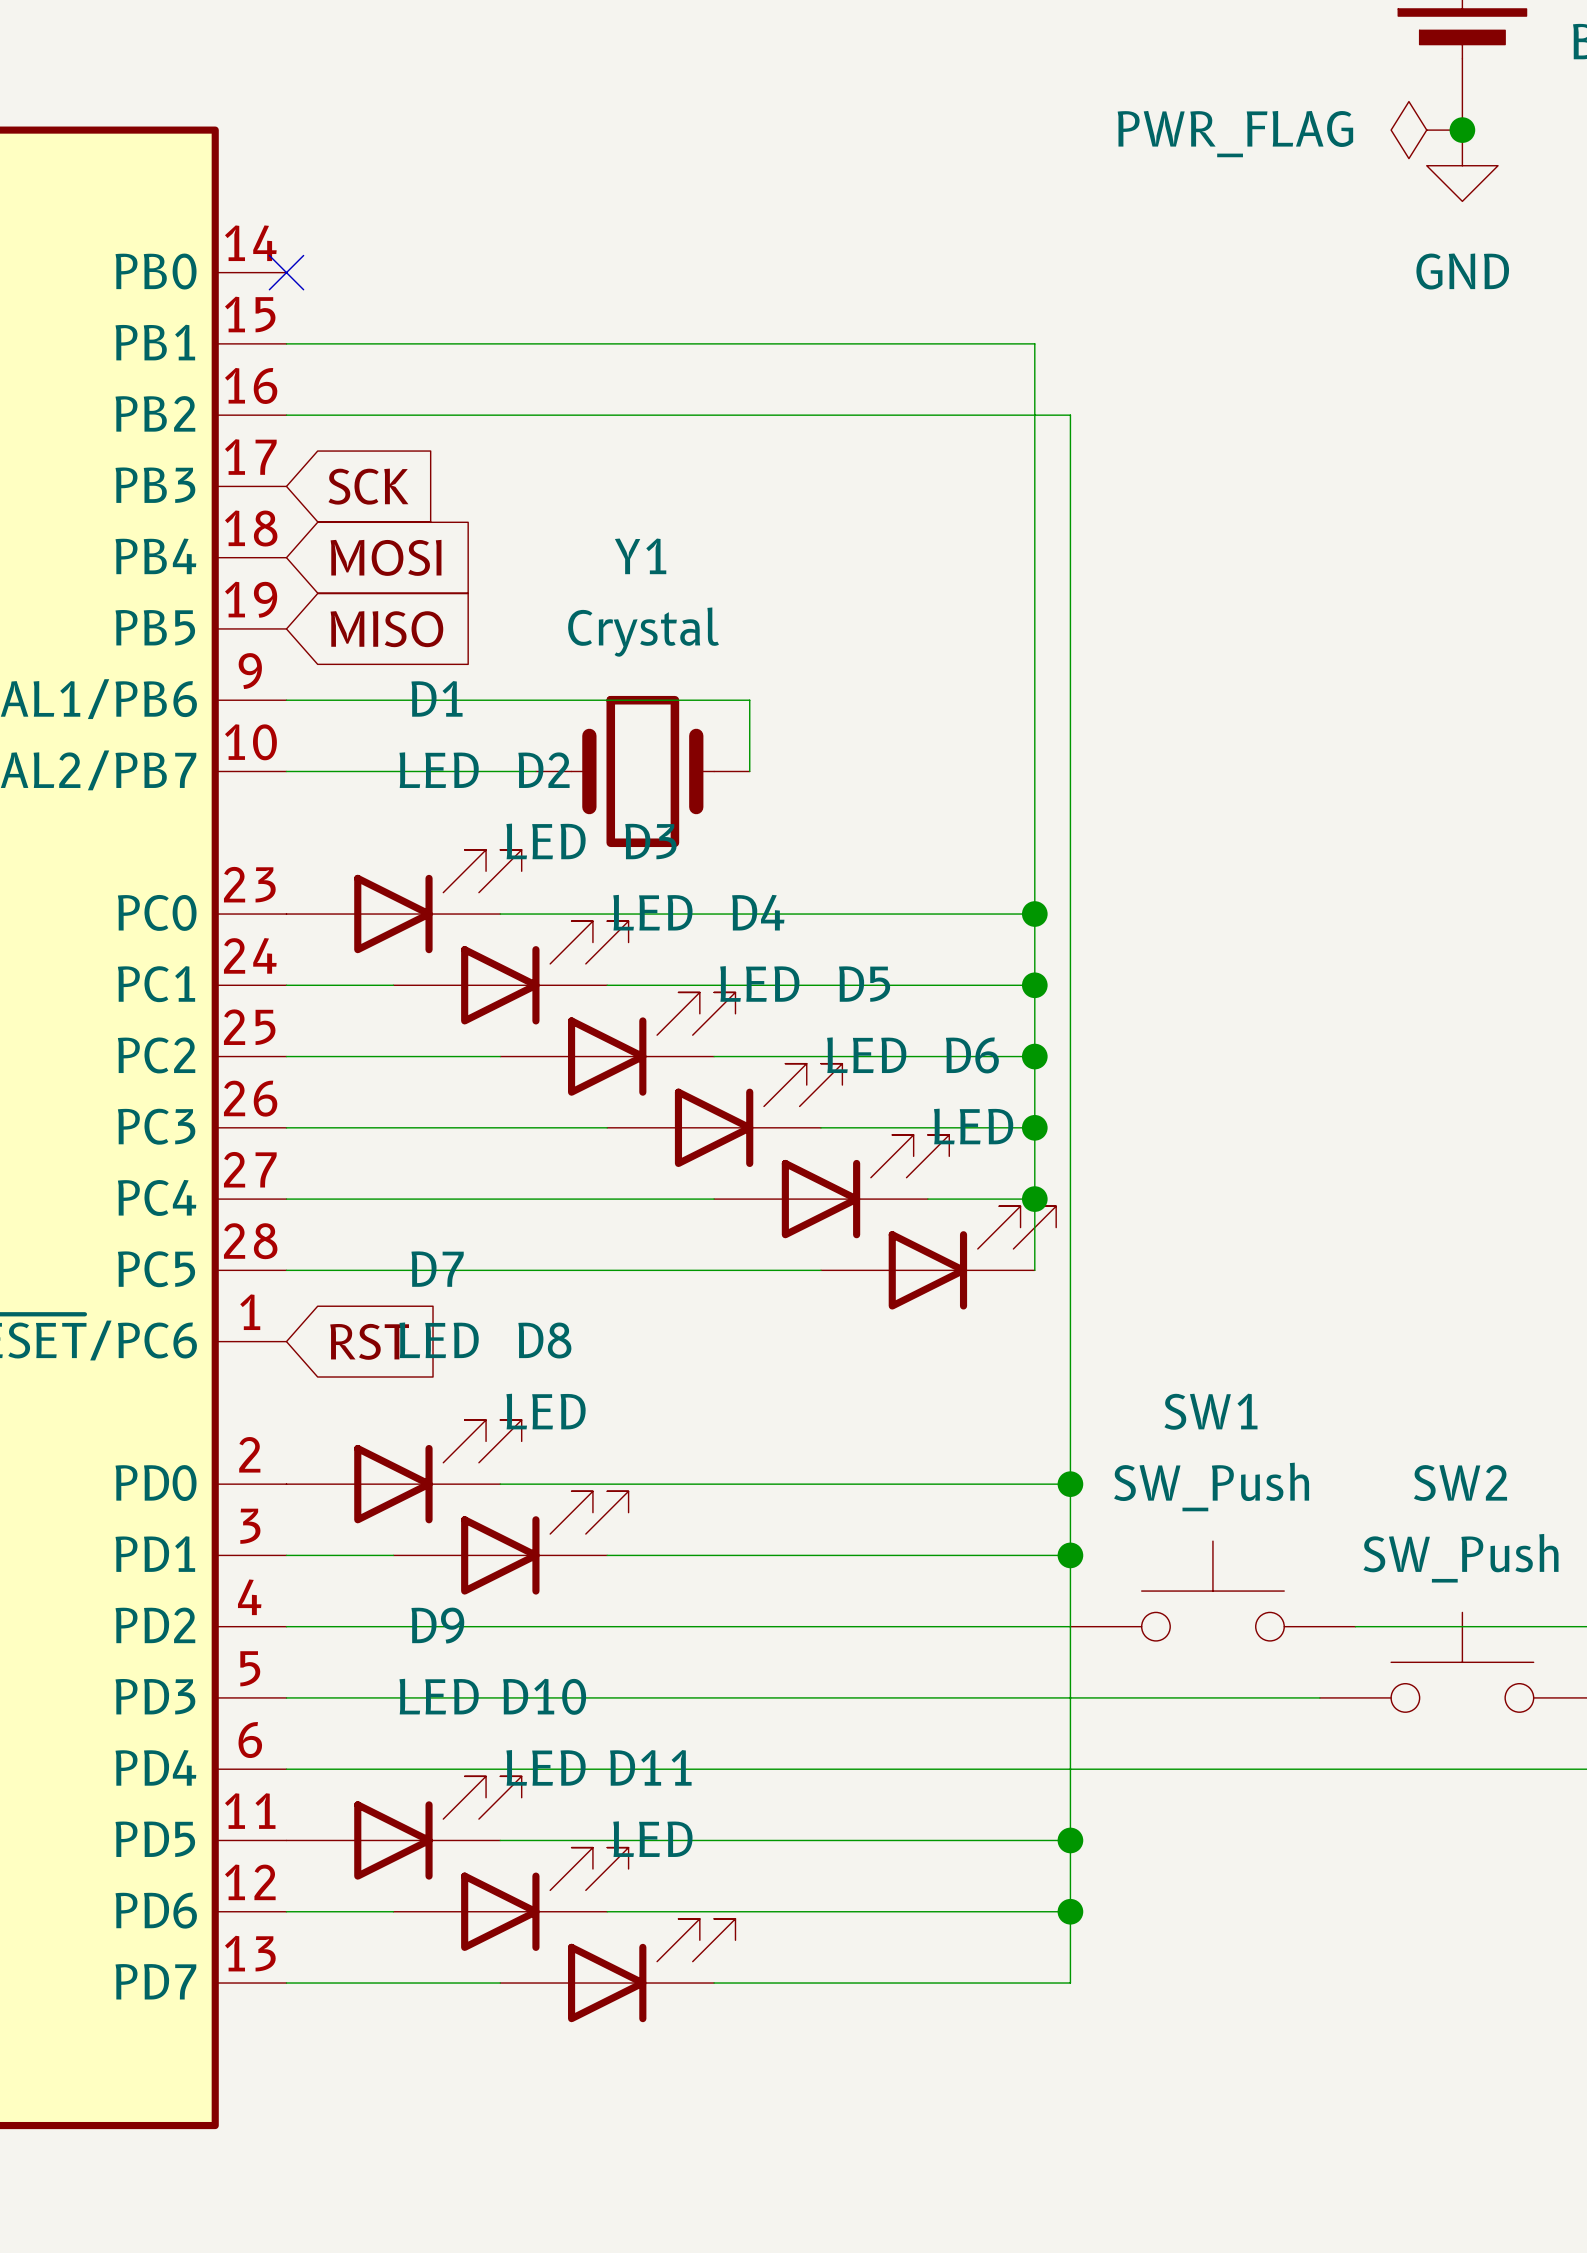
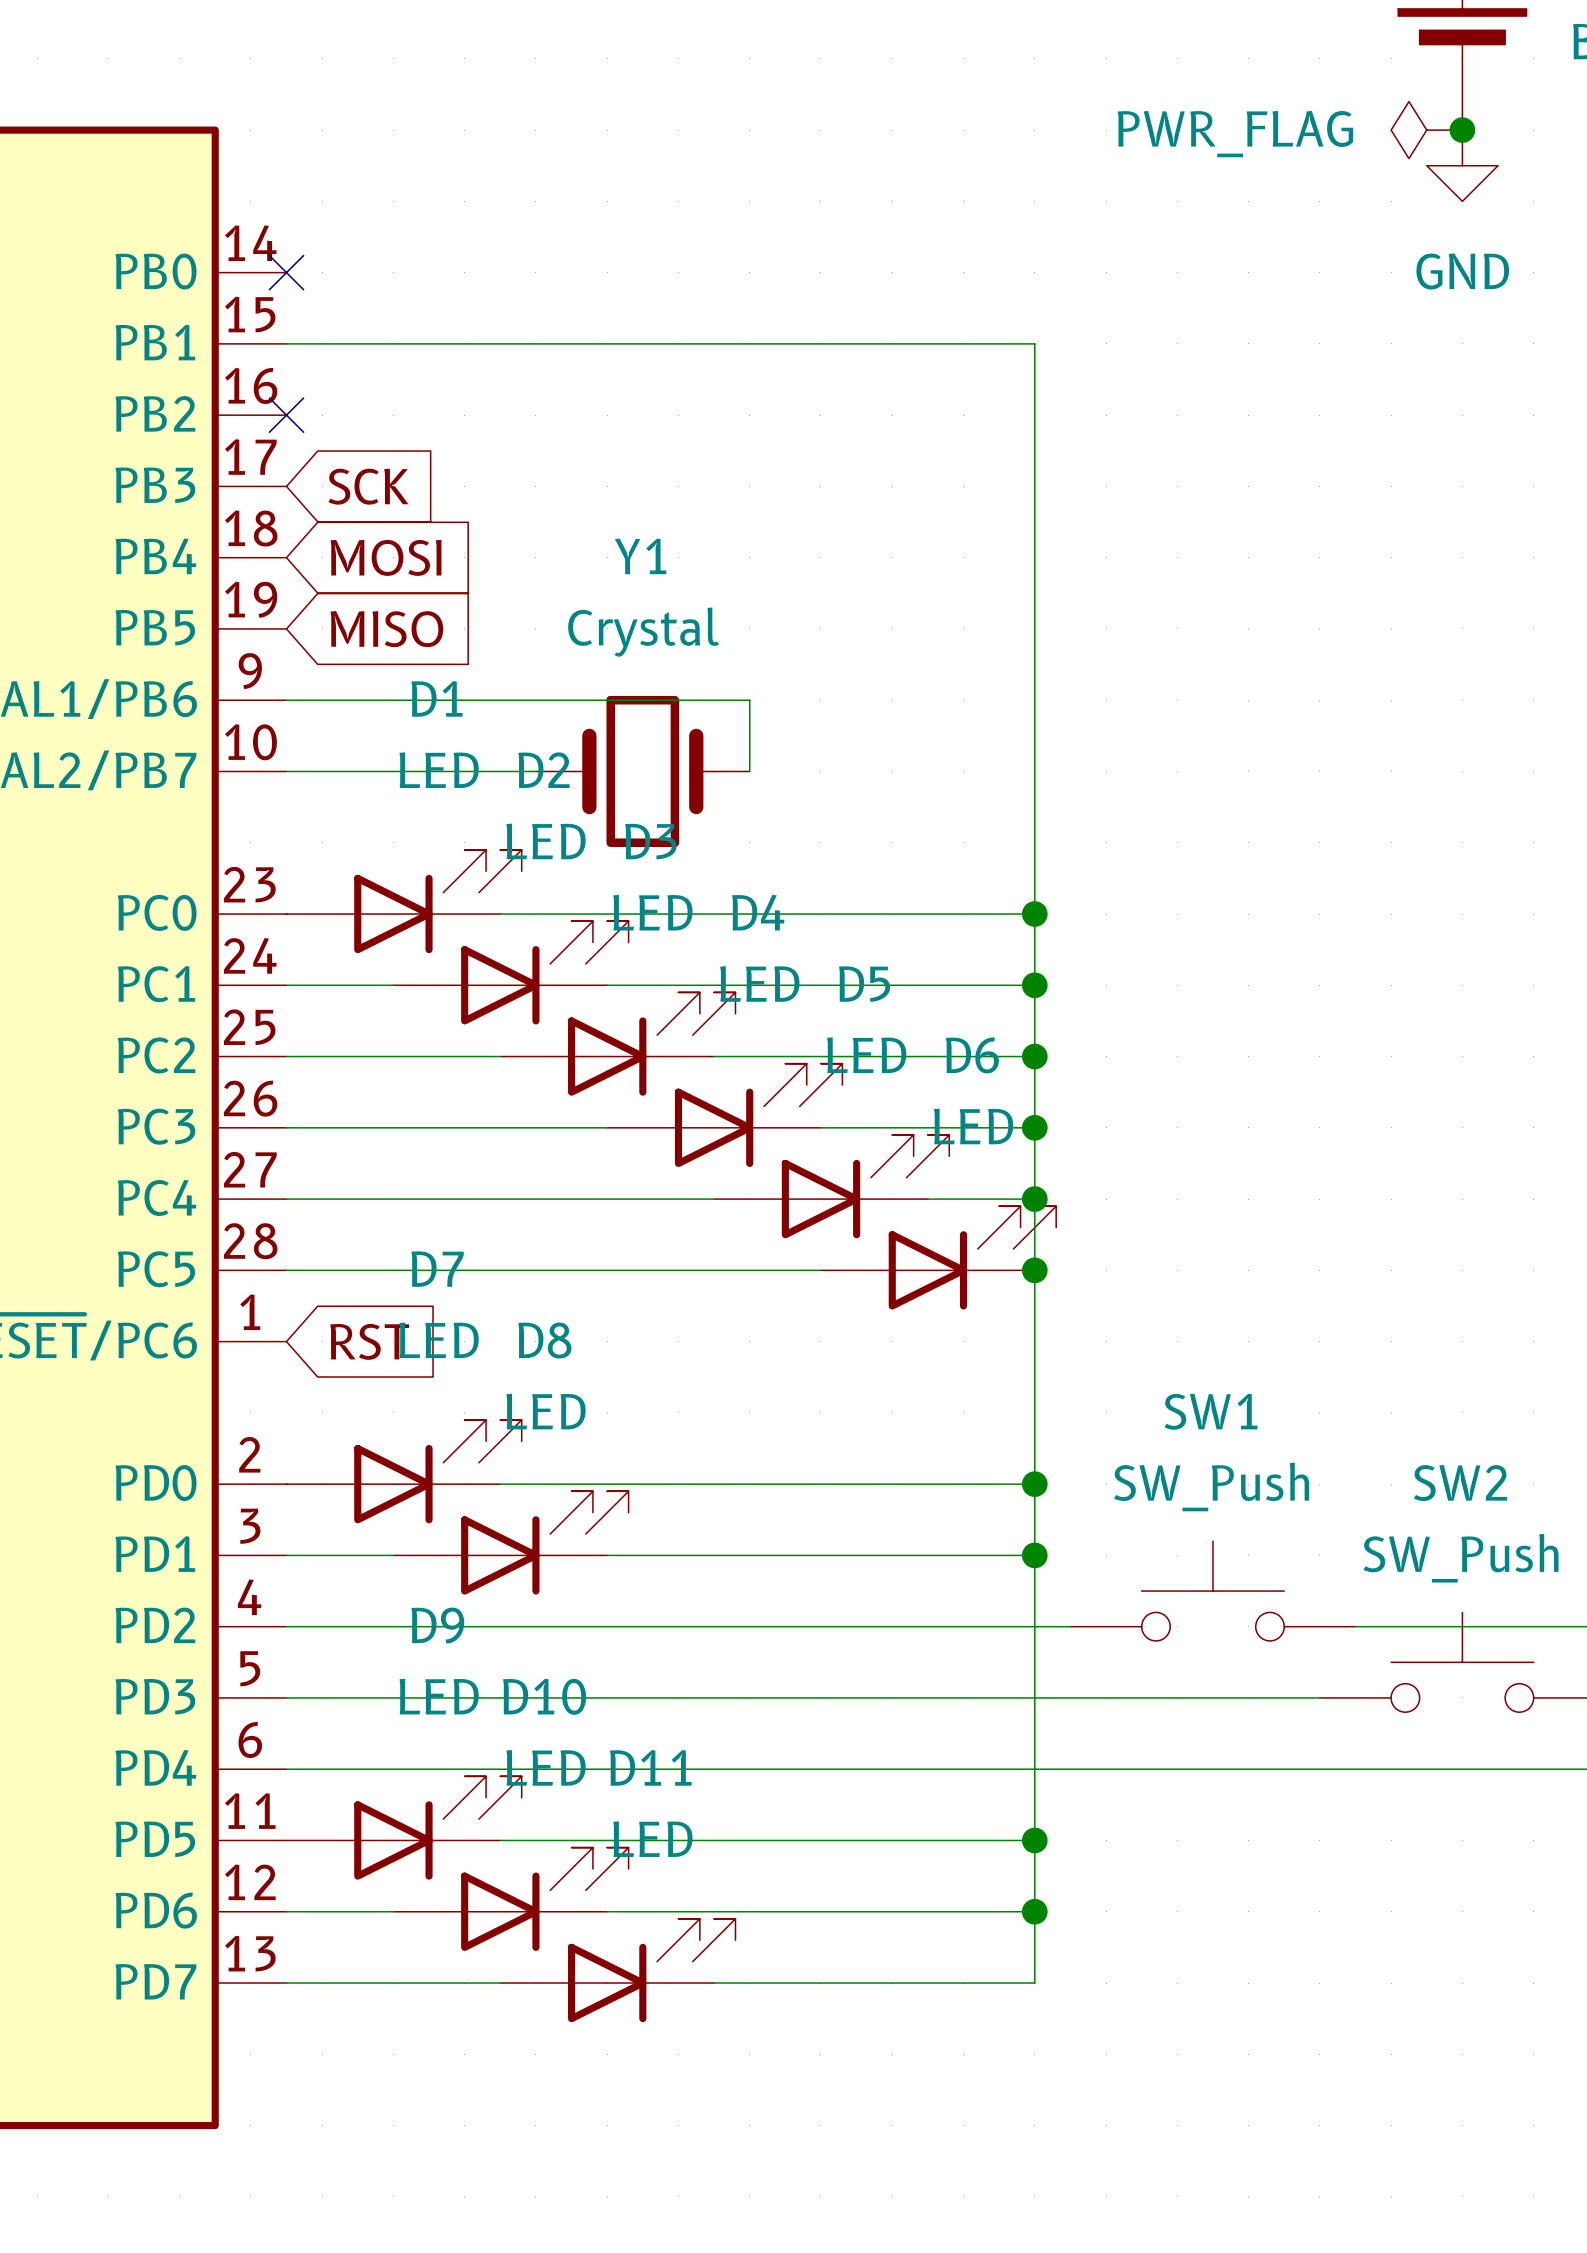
wire: (286, 415) (1070, 415) (1070, 1983) (1034, 1983) -> (1034, 1270) (1034, 1983)
no-connect mark: none -> (286, 415)
junction: none -> (1034, 1270)
wire: (1034, 1484) (1070, 1484) -> none
junction position: (1070, 1484) -> (1034, 1484)
wire: (1034, 1555) (1070, 1555) -> none
junction position: (1070, 1555) -> (1034, 1555)
wire: (1034, 1840) (1070, 1840) -> none
junction position: (1070, 1840) -> (1034, 1840)
wire: (1034, 1911) (1070, 1911) -> none
junction position: (1070, 1911) -> (1034, 1911)

